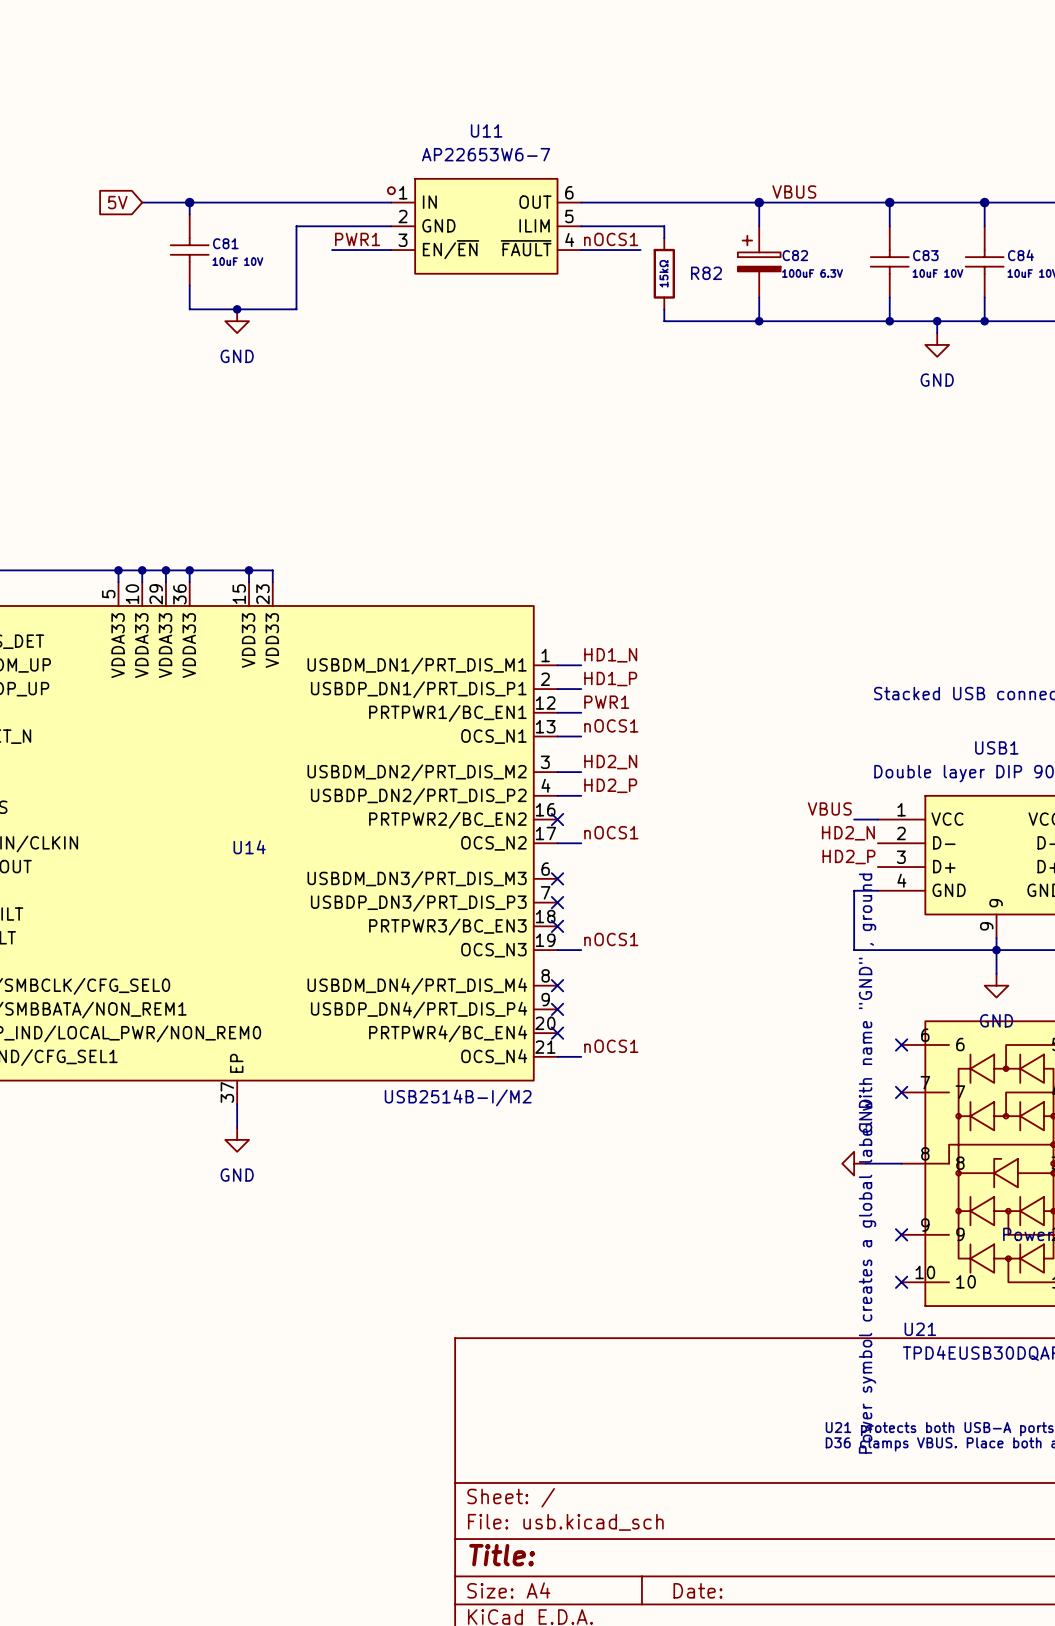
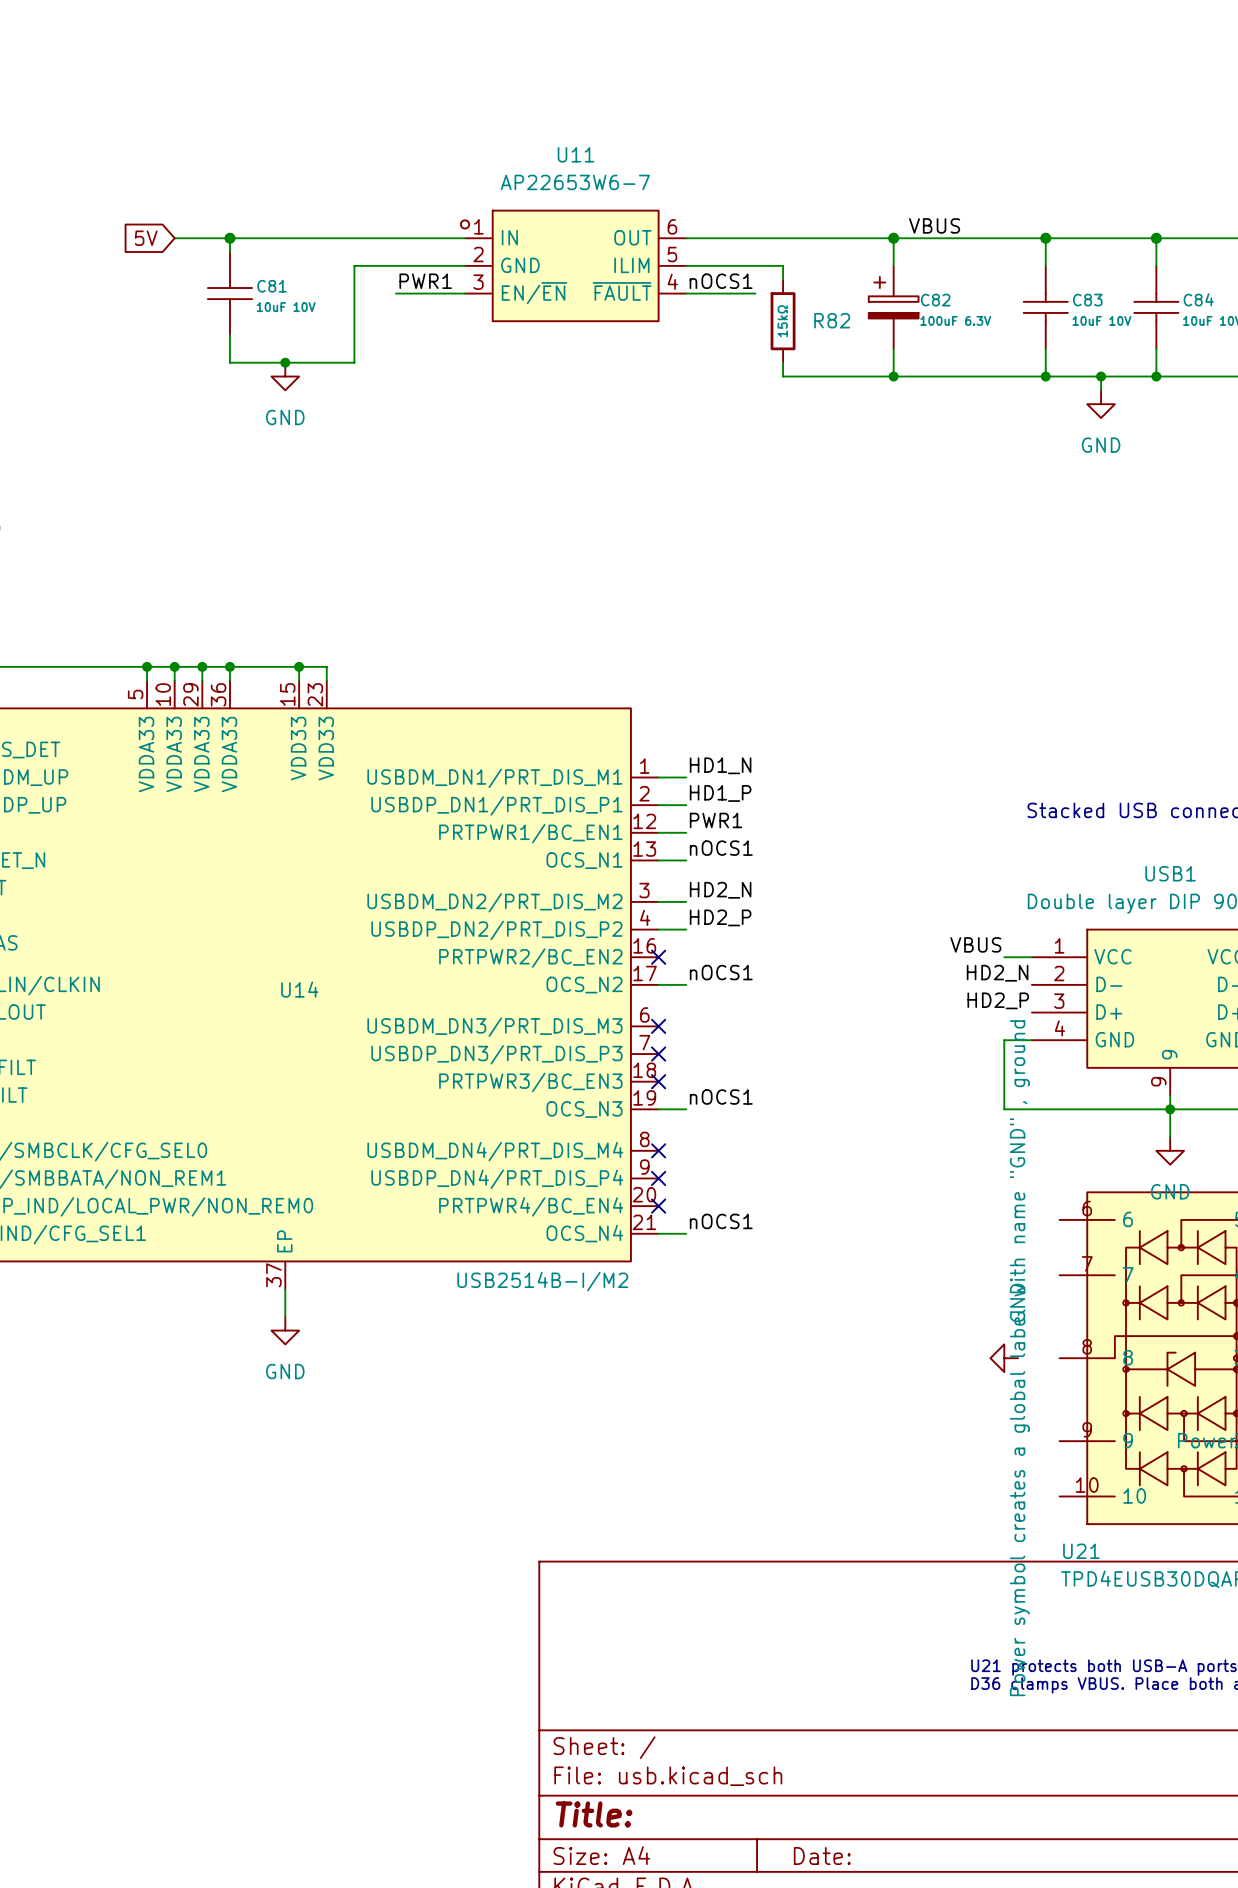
no-connect mark: (901, 1045) -> none
no-connect mark: (901, 1092) -> none
wire: (866, 1163) (901, 1163) -> none
no-connect mark: (901, 1234) -> none
no-connect mark: (901, 1282) -> none

